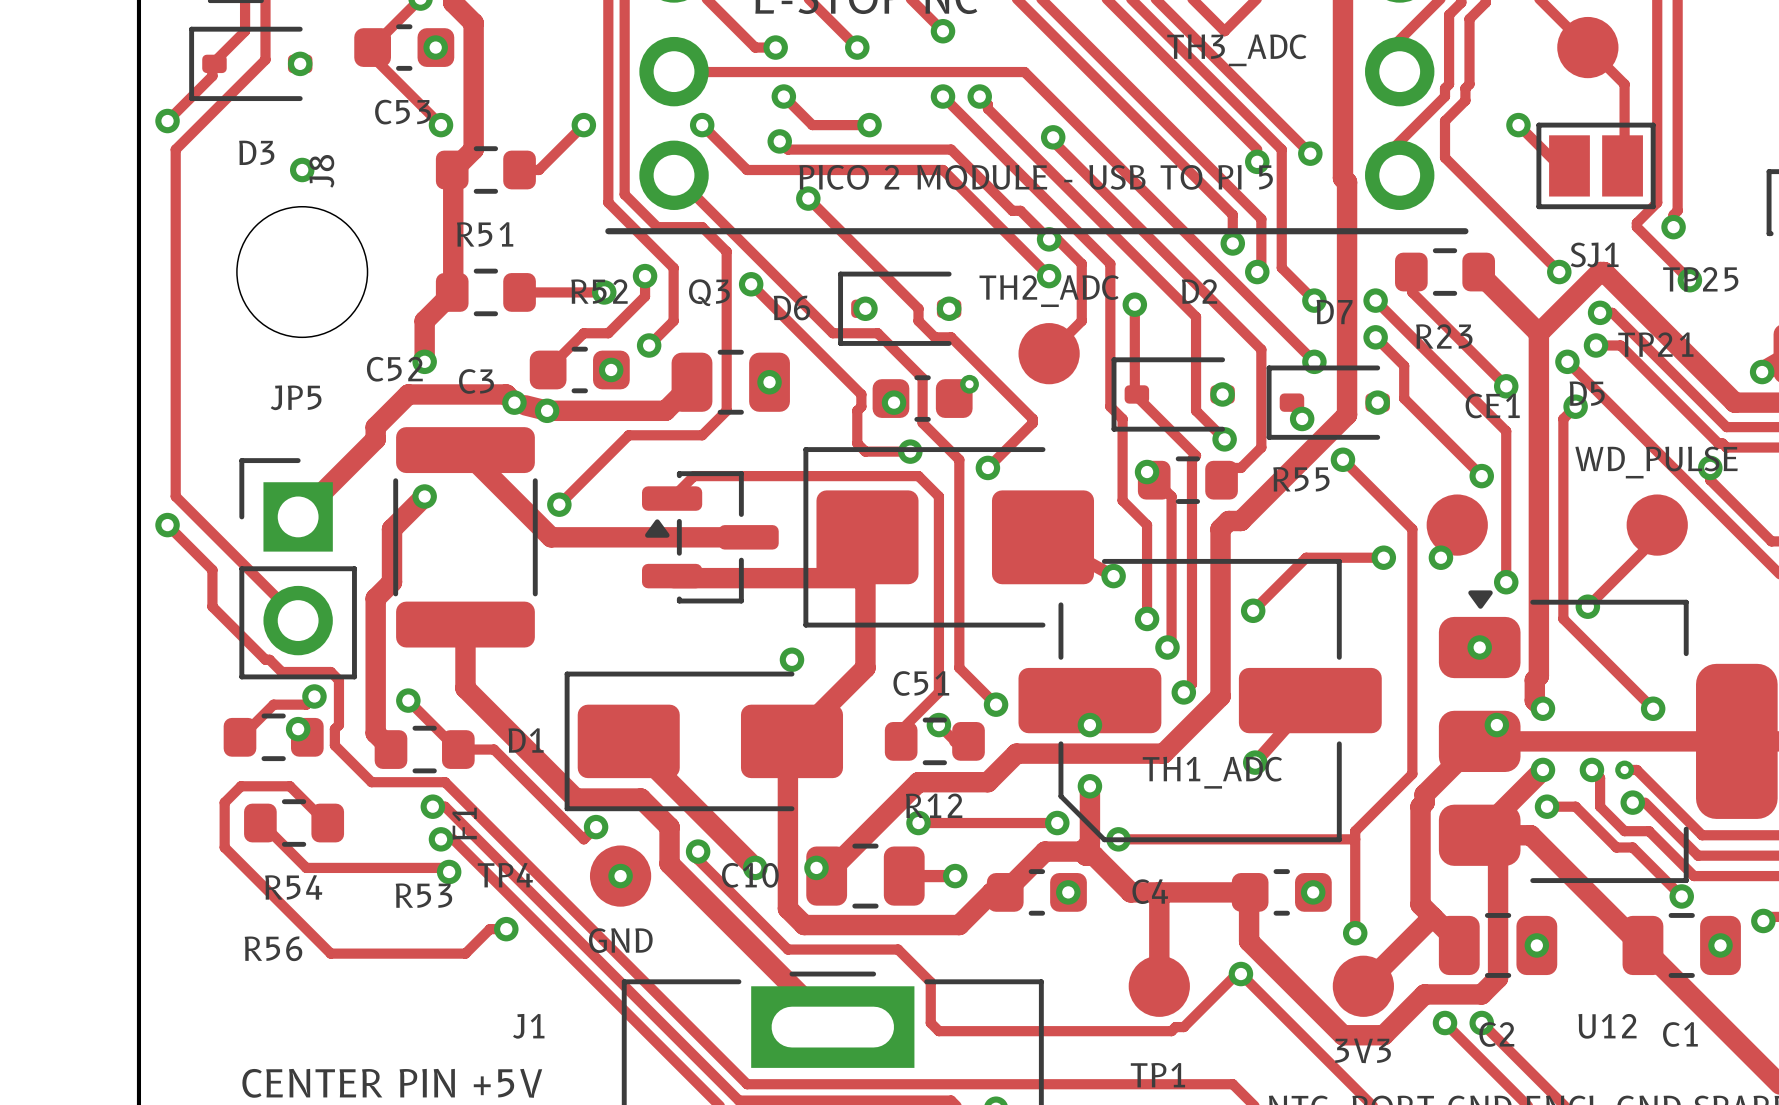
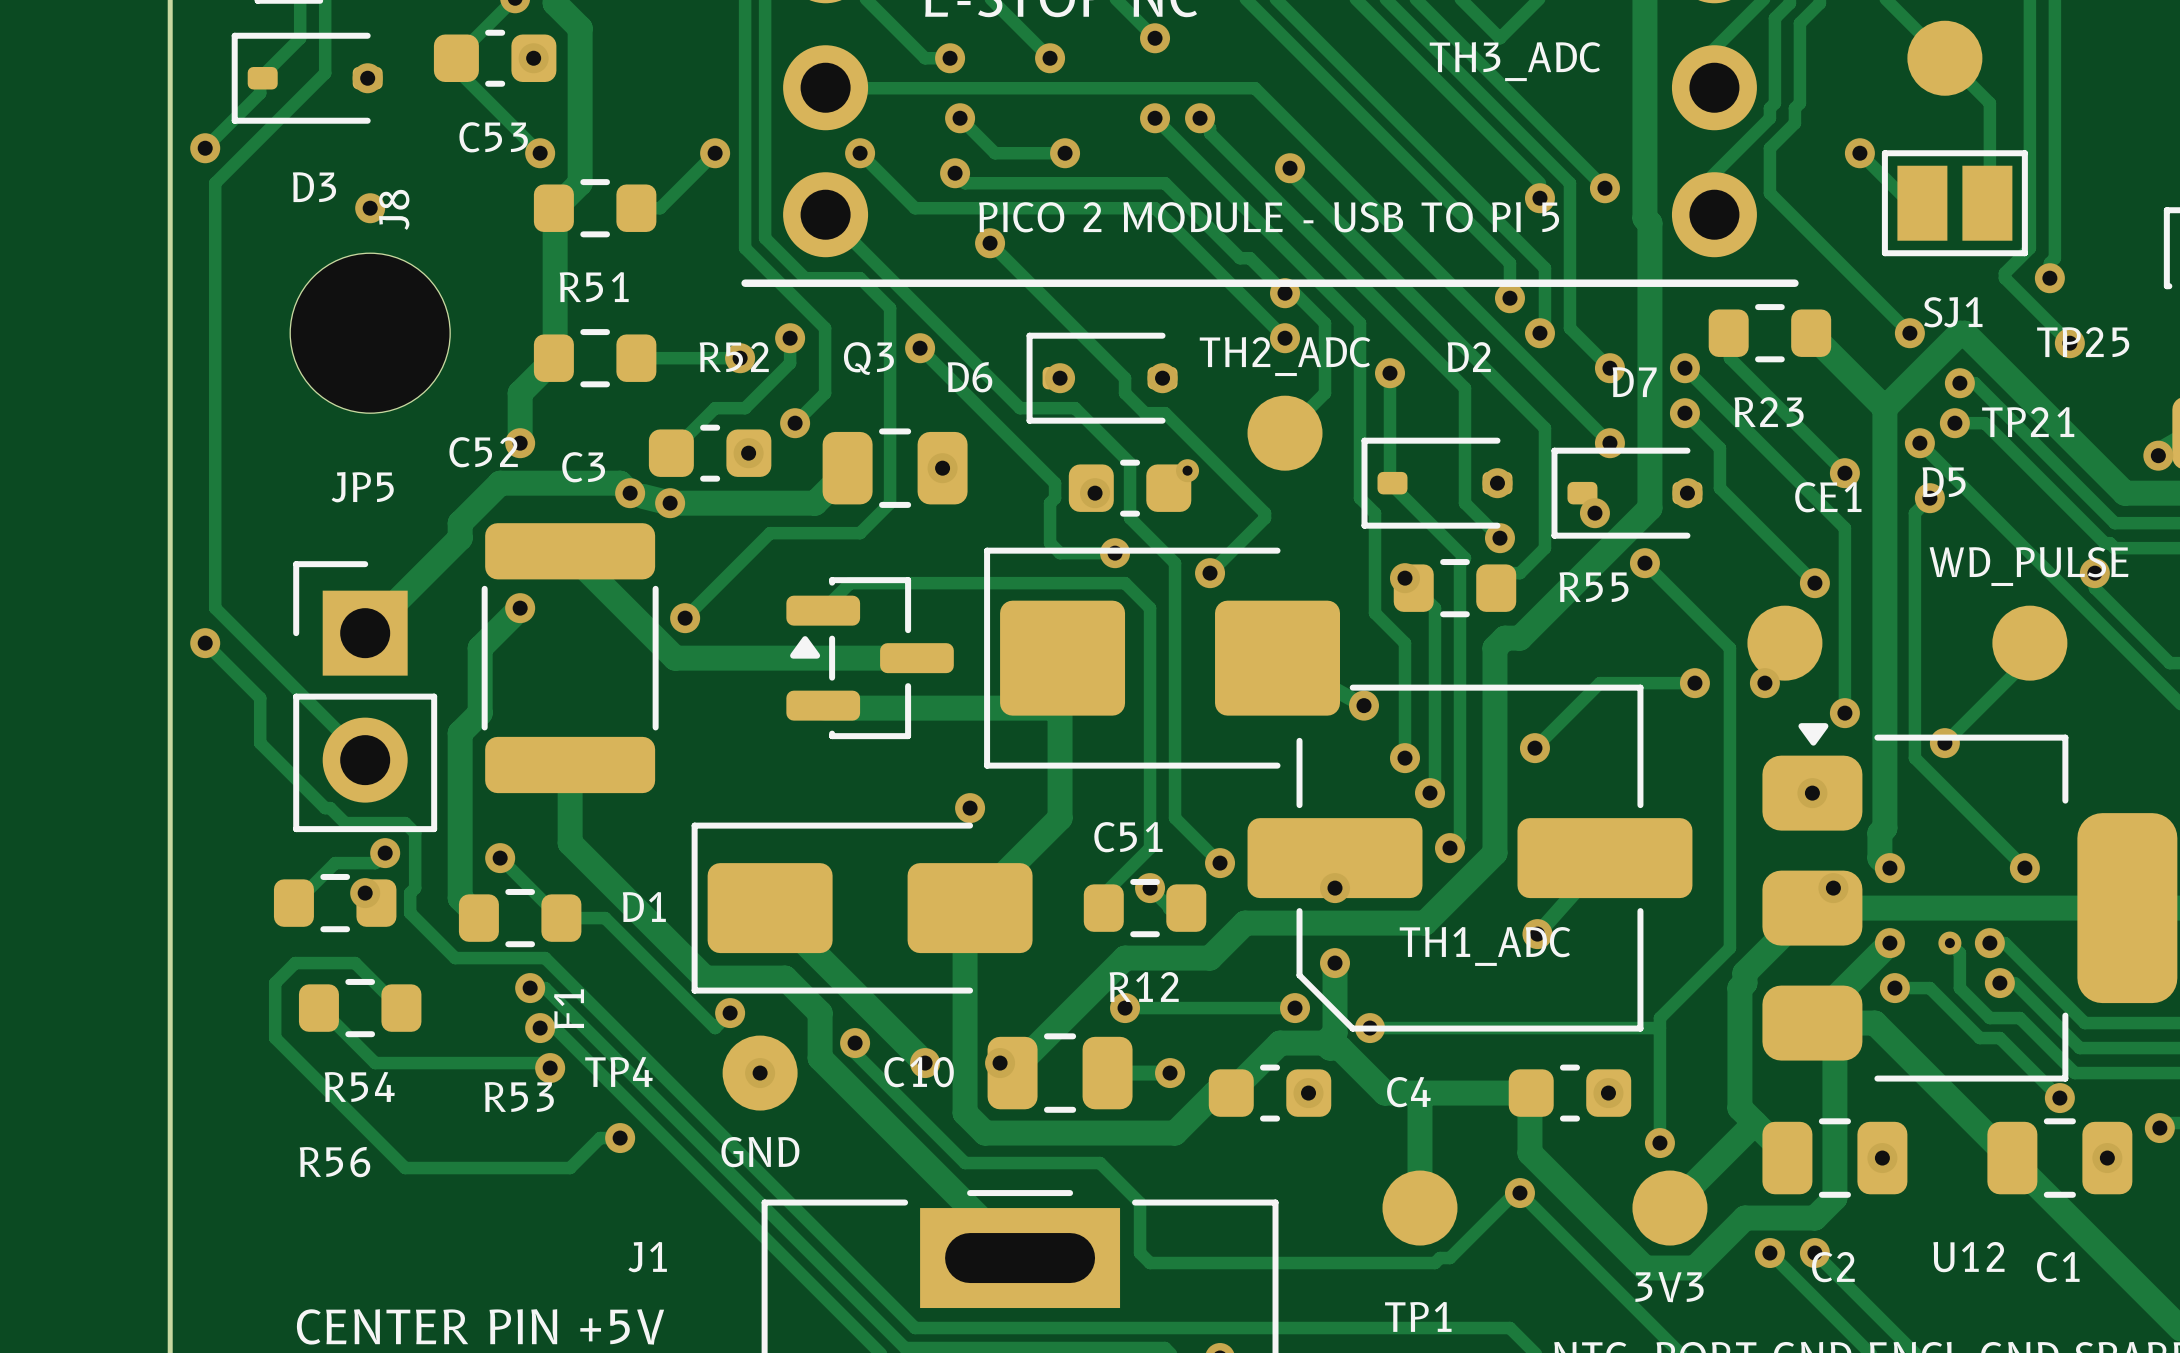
via position: (1591, 769) -> (1989, 943)
via position: (1624, 769) -> (1949, 943)

